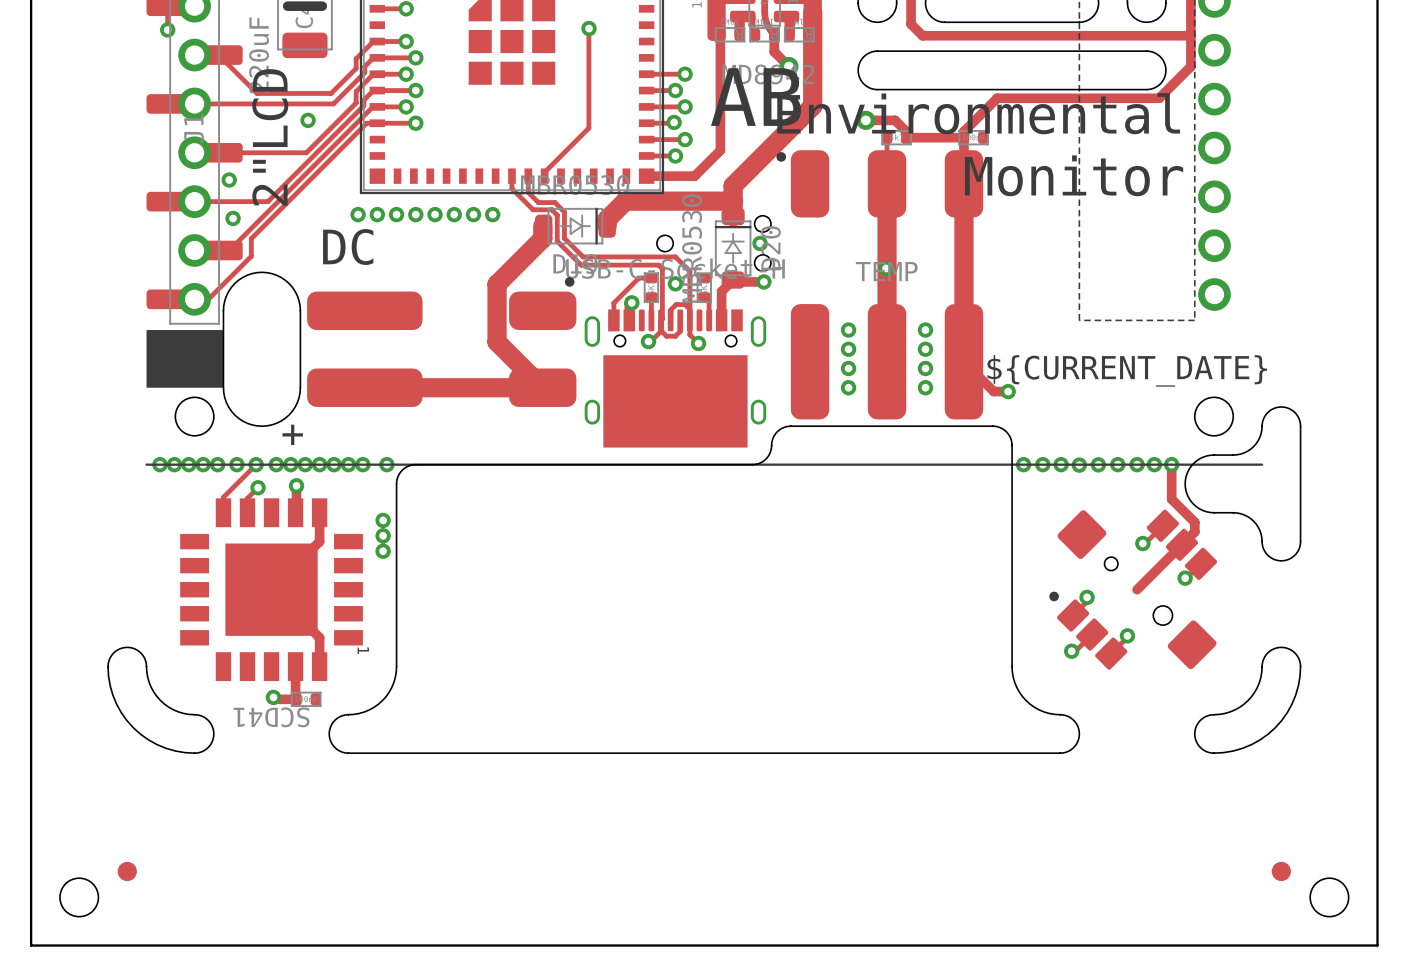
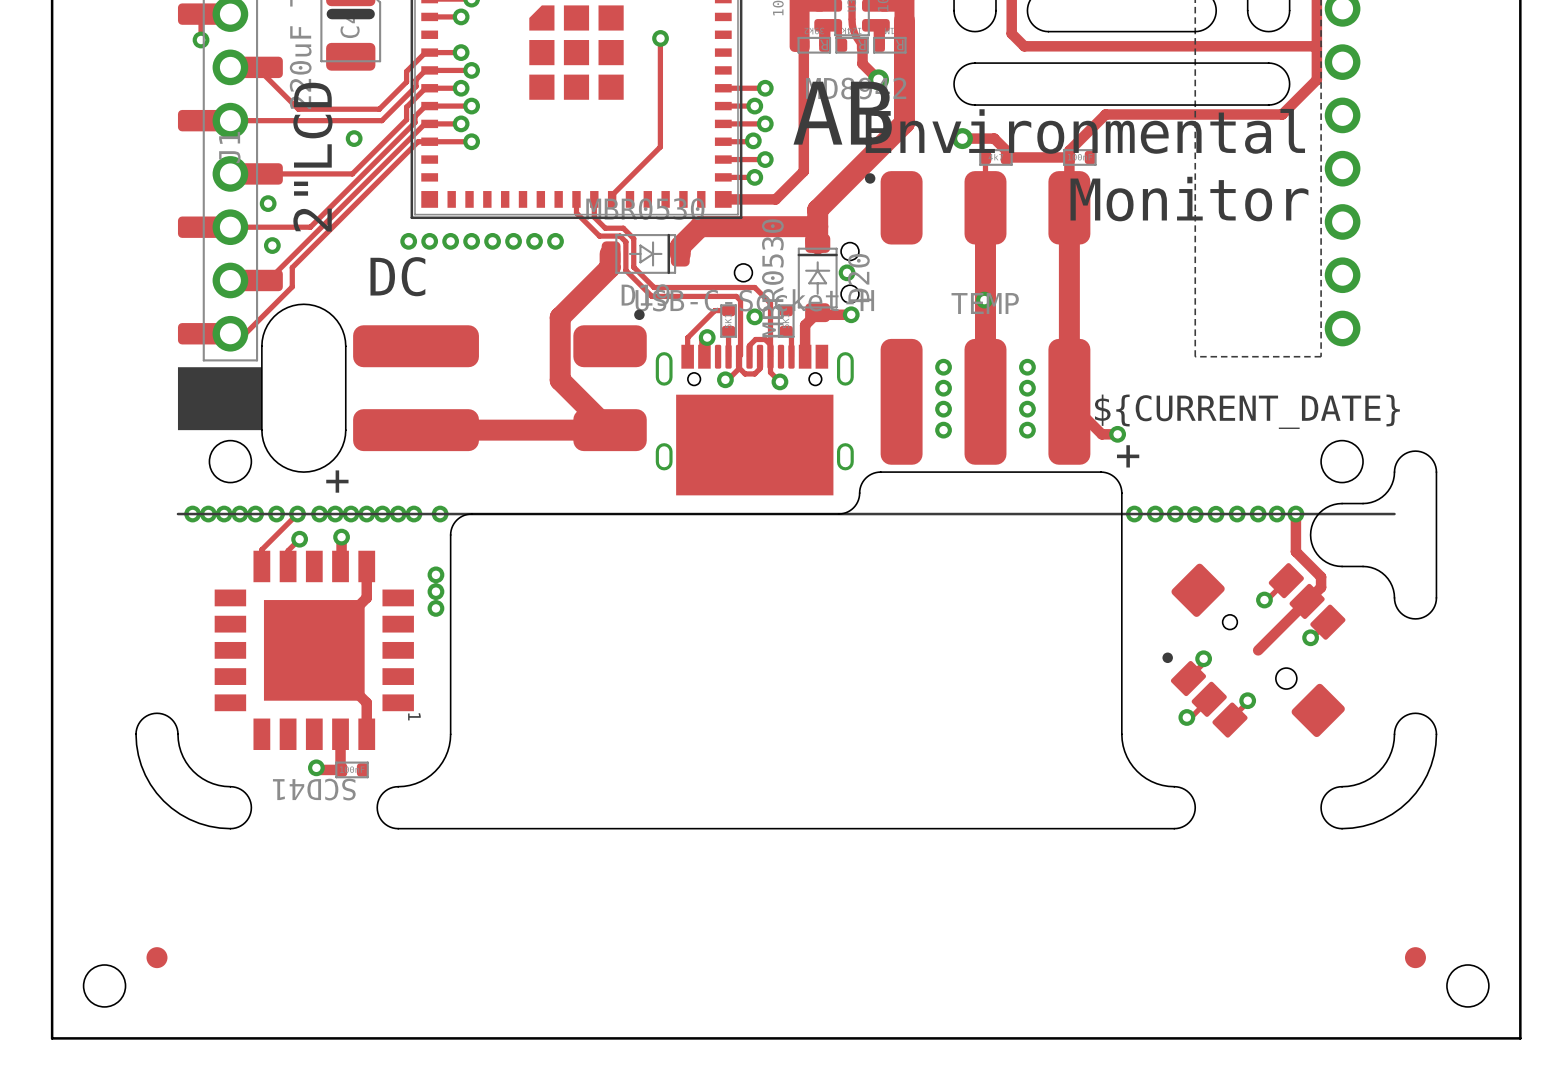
text: none -> + (1128, 456)

